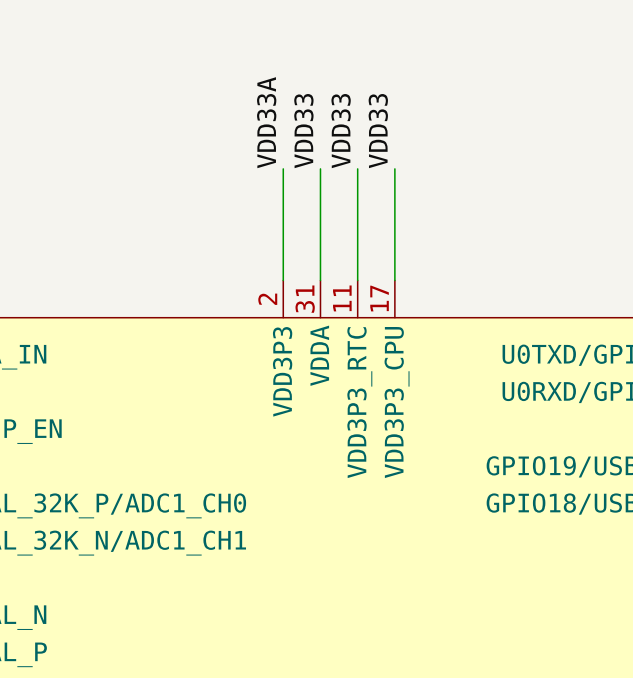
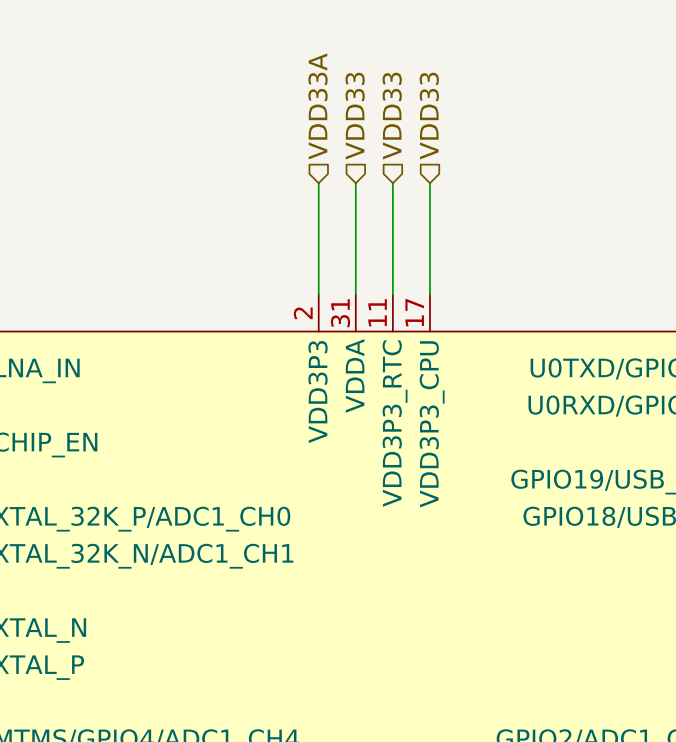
hierarchical label: none -> VDD33A (318, 106)
hierarchical label: none -> VDD33 (355, 116)
hierarchical label: none -> VDD33 (392, 116)
hierarchical label: none -> VDD33 (429, 116)
label: VDD33A (266, 122) -> none
label: VDD33 (303, 131) -> none
label: VDD33 (341, 131) -> none
label: VDD33 (378, 131) -> none

